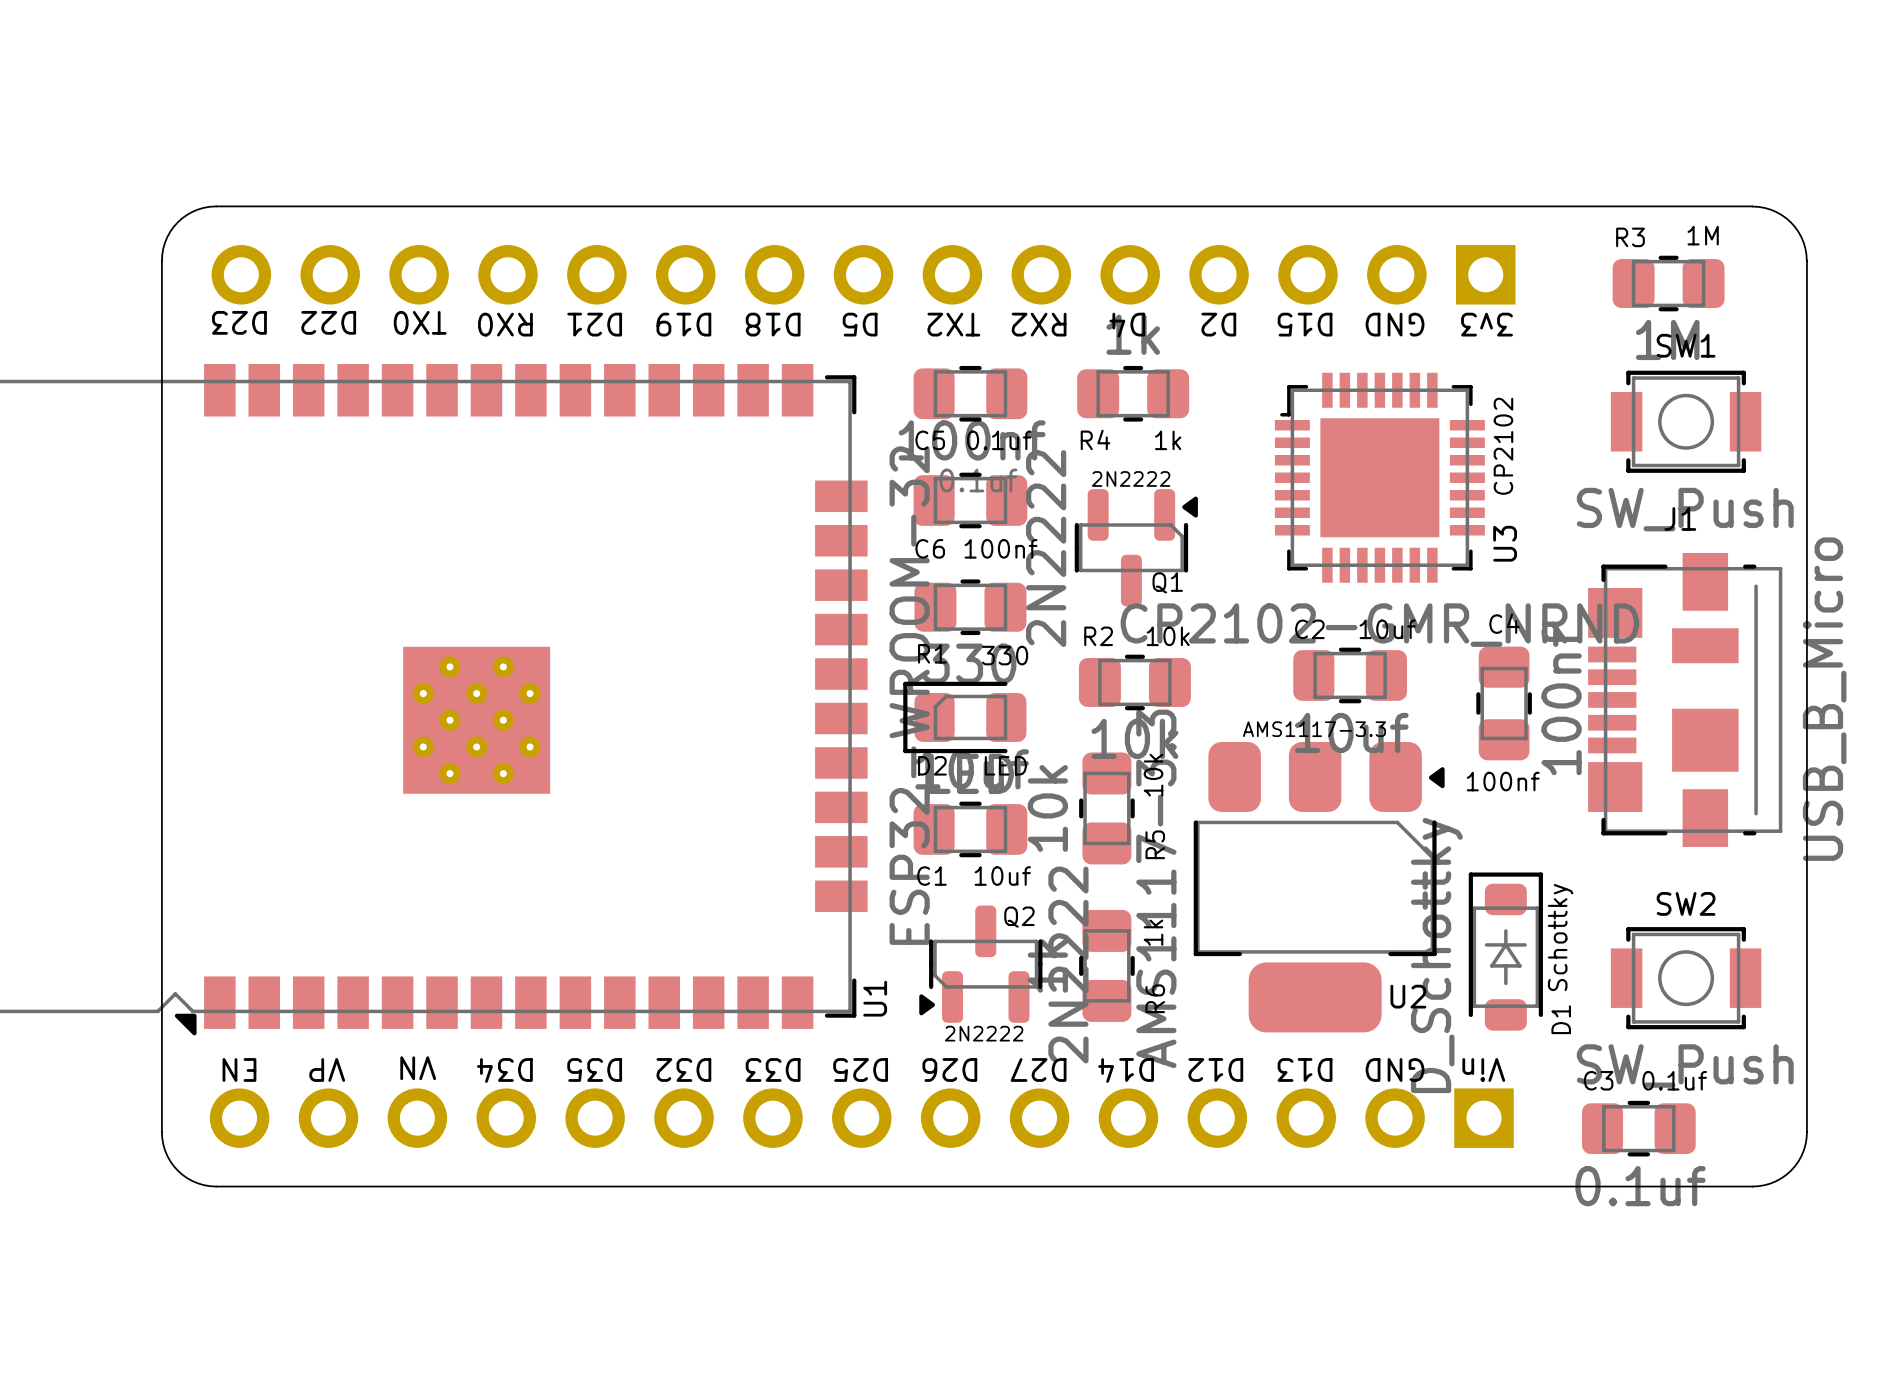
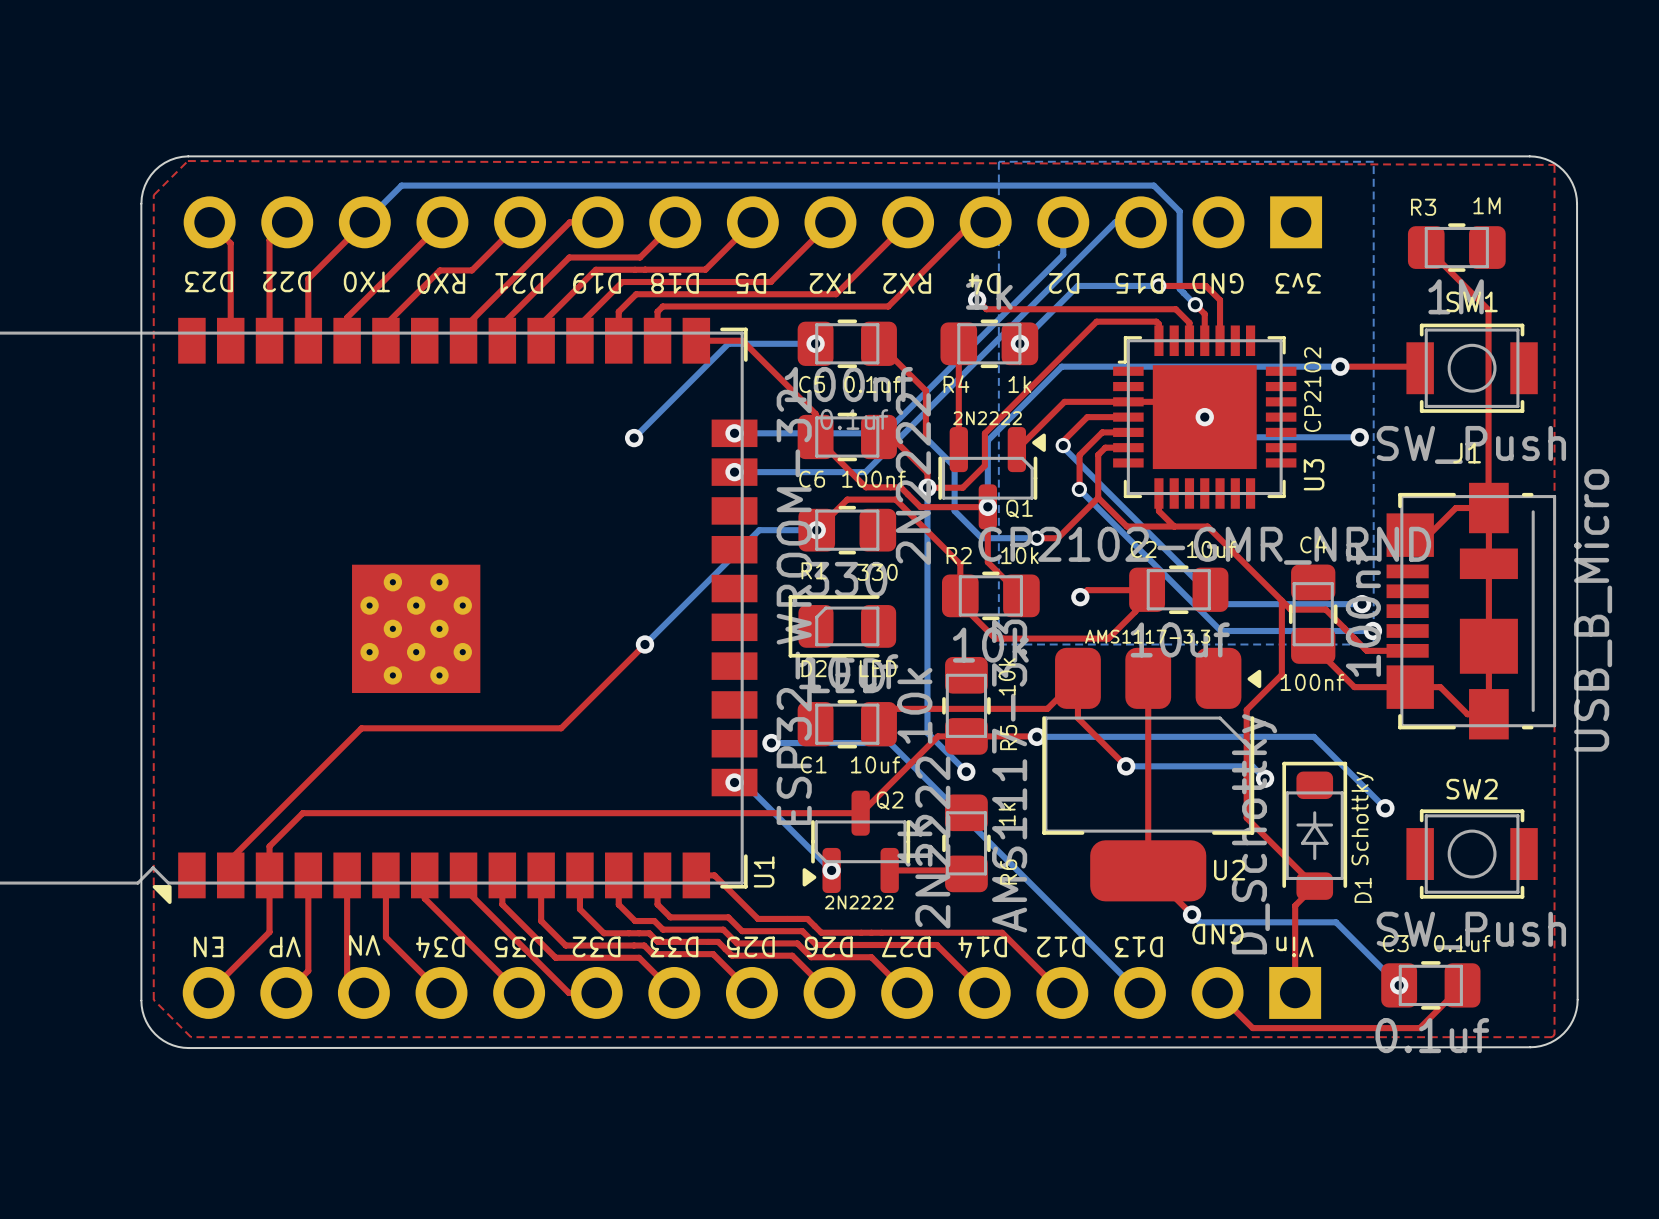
top zone outline: none -> (187, 161) (1554, 164) (1554, 1034) (1552, 1037) (191, 1037) (153, 999) (153, 195) (187, 161)
bottom zone outline: none -> (998, 161) (998, 644) (1373, 644) (1373, 161) (998, 161)
board edge: (216, 206) (1752, 206) (1770, 209) (1781, 214) (1798, 231) (1803, 242) (1806, 260) (1806, 1132) (1803, 1150) (1798, 1161) (1791, 1170) (1776, 1181) (1752, 1186) (216, 1186) (198, 1183) (187, 1178) (173, 1166) (167, 1155) (161, 1132) (161, 260) (167, 237) (177, 222) (192, 211) (204, 207) (210, 206) (216, 206) -> none
board edge: none -> (141, 203) (141, 1000)
board edge: none -> (141, 203) (144, 185) (155, 170) (170, 160) (188, 156) (1529, 156) (1545, 159) (1554, 163) (1569, 178) (1574, 188) (1577, 203) (1577, 999)
top track: none -> (209, 222) (230, 243) (230, 340)
top track: none -> (287, 222) (269, 240) (269, 340)
top track: none -> (364, 222) (308, 278) (308, 340)
bottom track: none -> (364, 222) (401, 185) (1153, 185) (1179, 211) (1179, 288) (1195, 304)
top track: none -> (442, 222) (347, 317) (347, 340)
top track: none -> (520, 222) (471, 270) (439, 270) (385, 324) (385, 340)
top track: none -> (597, 222) (569, 222) (463, 328) (463, 340)
top track: none -> (675, 222) (640, 257) (569, 257) (502, 324) (502, 340)
top track: none -> (752, 222) (705, 269) (645, 269)
top track: none -> (830, 222) (770, 282) (622, 282) (579, 324) (579, 340)
top track: none -> (908, 222) (836, 294) (636, 294) (618, 311) (618, 340)
top track: none -> (985, 222) (972, 222) (888, 306) (662, 306) (657, 311) (657, 340)
bottom track: none -> (1063, 222) (1063, 254) (884, 433) (734, 433)
bottom track: none -> (1140, 222) (1115, 222) (865, 472) (734, 472)
part position: (863, 274) -> (752, 222)
top track: none -> (1426, 247) (1488, 309) (1488, 507)
top track: none -> (645, 269) (595, 269) (541, 324) (541, 340)
top track: none -> (1158, 285) (1205, 285) (1220, 300) (1220, 340)
bottom track: none -> (1158, 285) (1077, 285) (1019, 343)
via: none -> (1158, 285)
top track: none -> (977, 299) (986, 309) (1175, 309) (1189, 322) (1189, 340)
via: none -> (977, 299)
top track: none -> (1195, 304) (1204, 314) (1204, 340)
via: none -> (1195, 304)
top track: none -> (696, 340) (742, 340) (815, 413) (815, 436) (865, 487) (900, 487) (920, 507) (987, 507)
top track: none -> (1158, 340) (1158, 324) (1156, 321) (1096, 321) (984, 433) (984, 465) (962, 487) (927, 487) (927, 472) (891, 436) (878, 436)
bottom track: none -> (815, 343) (728, 343) (634, 438)
via: none -> (815, 343)
top track: none -> (878, 343) (925, 390) (925, 438)
top track: none -> (958, 343) (958, 449)
via: none -> (1019, 343)
top track: none -> (1340, 366) (1418, 366)
bottom track: none -> (1340, 366) (1061, 366) (987, 440) (987, 506)
via: none -> (1340, 366)
top track: none -> (1128, 417) (1087, 417) (1063, 441) (1063, 445)
top track: none -> (1204, 417) (1189, 401) (1064, 401) (1016, 449)
bottom track: none -> (1204, 417) (1224, 437) (1359, 437)
via: none -> (1204, 417)
top track: none -> (1128, 432) (1102, 432) (1079, 455) (1079, 489)
via: none -> (734, 433)
via: none -> (1359, 437)
via: none -> (634, 438)
bottom track: none -> (925, 438) (954, 466) (954, 511) (981, 538) (1036, 538)
via: none -> (1063, 445)
bottom track: none -> (1062, 446) (1220, 604) (1362, 604)
top track: none -> (1128, 447) (1105, 447) (1098, 454) (1098, 497)
via: none -> (734, 472)
bottom track: none -> (927, 487) (927, 732) (966, 771)
via: none -> (927, 487)
bottom track: none -> (1079, 489) (1220, 630) (1372, 630)
via: none -> (1079, 489)
top track: none -> (1158, 493) (1158, 511) (1174, 526)
top track: none -> (1098, 497) (1057, 538) (1036, 538)
top track: none -> (1098, 497) (1126, 526) (1207, 526) (1290, 609) (1325, 609) (1344, 628)
top track: none -> (987, 506) (987, 562) (1021, 595)
via: none -> (987, 506)
top track: none -> (816, 530) (847, 499) (895, 499) (960, 564) (960, 603) (995, 638) (1108, 638) (1135, 611) (1135, 590) (1087, 590) (1080, 597)
bottom track: none -> (816, 530) (759, 530) (644, 644)
via: none -> (816, 530)
top track: none -> (1410, 535) (1428, 535) (1455, 508) (1488, 508) (1488, 714) (1467, 714) (1440, 687) (1354, 687) (1313, 645)
via: none -> (1036, 538)
via: none -> (1080, 597)
top track: none -> (1281, 600) (1281, 674) (1246, 709) (1246, 818) (1314, 886) (1295, 905) (1295, 992)
via: none -> (1362, 604)
top track: none -> (1344, 628) (1366, 650) (1407, 650)
via: none -> (1372, 630)
top track: none -> (644, 644) (561, 728) (361, 728) (230, 859) (230, 875)
via: none -> (644, 644)
top track: none -> (1147, 679) (1148, 870) (1192, 914)
top track: none -> (878, 724) (894, 708) (1047, 708) (1077, 678) (1077, 718) (1126, 766)
top track: none -> (1036, 736) (938, 736) (861, 813) (302, 813) (269, 846) (269, 932) (208, 992)
bottom track: none -> (1036, 736) (1313, 736) (1385, 808)
via: none -> (1036, 736)
bottom track: none -> (771, 743) (890, 743) (1139, 992)
via: none -> (771, 743)
bottom track: none -> (1126, 766) (1252, 766) (1265, 778)
via: none -> (1126, 766)
via: none -> (966, 771)
via: none -> (1265, 778)
bottom track: none -> (734, 782) (743, 782) (831, 870)
via: none -> (734, 782)
via: none -> (1385, 808)
via: none -> (831, 870)
top track: none -> (889, 870) (963, 870) (966, 873)
top track: none -> (308, 875) (308, 970) (286, 992)
top track: none -> (347, 875) (347, 976) (363, 992)
top track: none -> (385, 875) (385, 937) (441, 992)
top track: none -> (424, 875) (424, 898) (519, 992)
top track: none -> (463, 875) (463, 887) (568, 992) (596, 992)
top track: none -> (502, 875) (502, 904) (555, 957) (639, 957) (674, 992)
top track: none -> (541, 875) (541, 920) (565, 945) (644, 945) (652, 954) (713, 954) (751, 992)
top track: none -> (579, 875) (579, 909) (603, 933) (649, 933) (657, 941) (718, 941) (732, 955) (792, 955) (829, 992)
top track: none -> (618, 875) (618, 904) (635, 921) (654, 921) (663, 929) (723, 929) (737, 943) (797, 943) (811, 957) (871, 957) (907, 992)
top track: none -> (657, 875) (657, 904) (670, 917) (728, 917) (742, 931) (802, 931) (816, 944) (936, 944) (984, 992)
top track: none -> (696, 875) (714, 875) (758, 918) (807, 918) (821, 932) (1002, 932) (1062, 992)
bottom track: none -> (1192, 914) (1199, 922) (1336, 922) (1399, 985)
via: none -> (1192, 914)
text position: VN (418, 1068) -> VN (364, 945)
text position: EN (239, 1069) -> EN (208, 946)
text position: VP (327, 1069) -> VP (285, 946)
text position: D35 (594, 1069) -> D35 (518, 946)
text position: D32 (683, 1069) -> D32 (596, 946)
text position: D33 (773, 1069) -> D33 (674, 946)
text position: D25 (860, 1069) -> D25 (750, 946)
text position: D26 (949, 1069) -> D26 (828, 946)
text position: D27 (1038, 1069) -> D27 (906, 946)
text position: D12 (1215, 1069) -> D12 (1061, 946)
text position: D13 (1305, 1069) -> D13 (1138, 946)
text position: Vin (1483, 1069) -> Vin (1294, 946)
text position: D34 (504, 1070) -> D34 (440, 947)
text position: D14 (1126, 1070) -> D14 (982, 947)
part position: (861, 1118) -> (751, 992)
via: none -> (1399, 985)
top track: none -> (1462, 985) (1419, 1028) (1252, 1028) (1217, 992)
board edge: none -> (1577, 999) (1574, 1015) (1563, 1033) (1550, 1042) (1530, 1047) (188, 1048) (168, 1043) (155, 1034) (144, 1016) (141, 1000)

